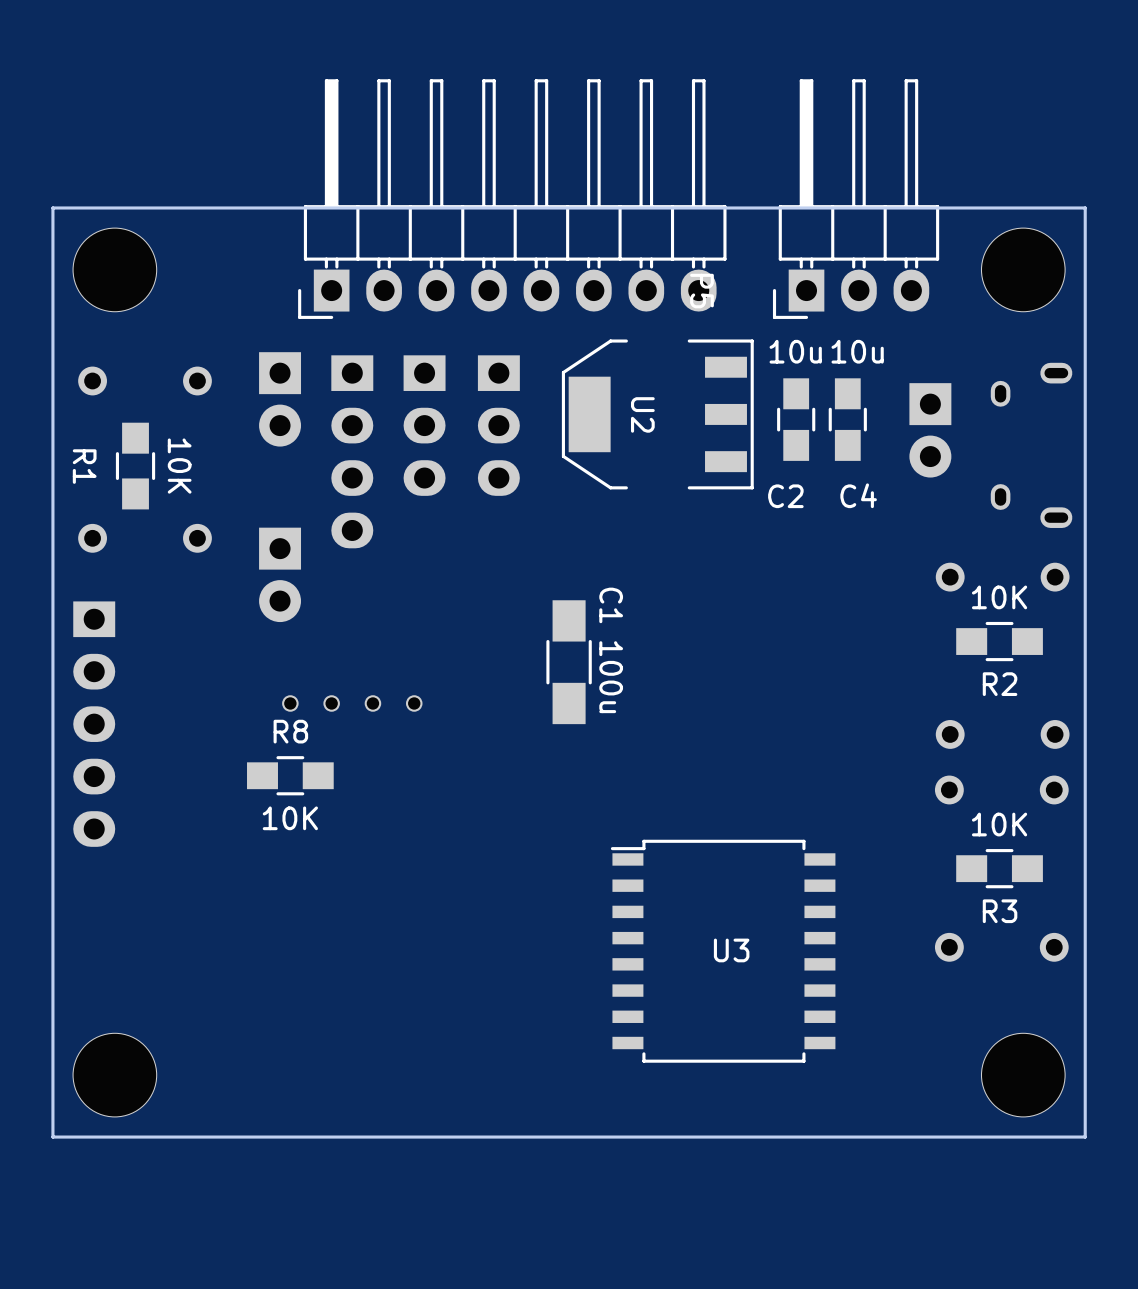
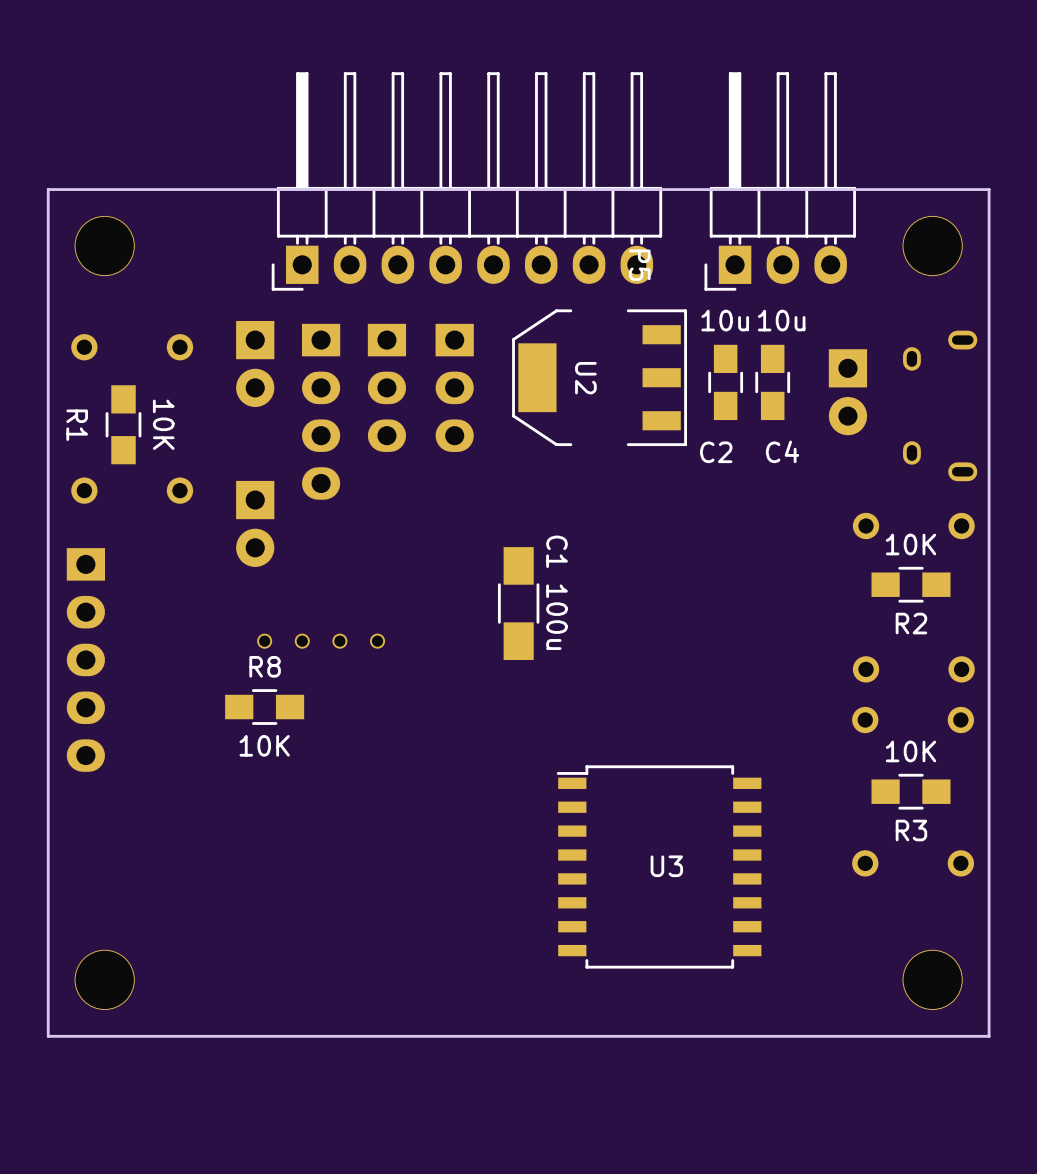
part footprint: [72, 227, 158, 313] -> [74, 215, 135, 277]
part footprint: [980, 227, 1066, 313] -> [902, 215, 963, 277]
part footprint: [72, 1032, 158, 1118] -> [74, 949, 135, 1010]
part footprint: [980, 1032, 1066, 1118] -> [902, 949, 963, 1010]

